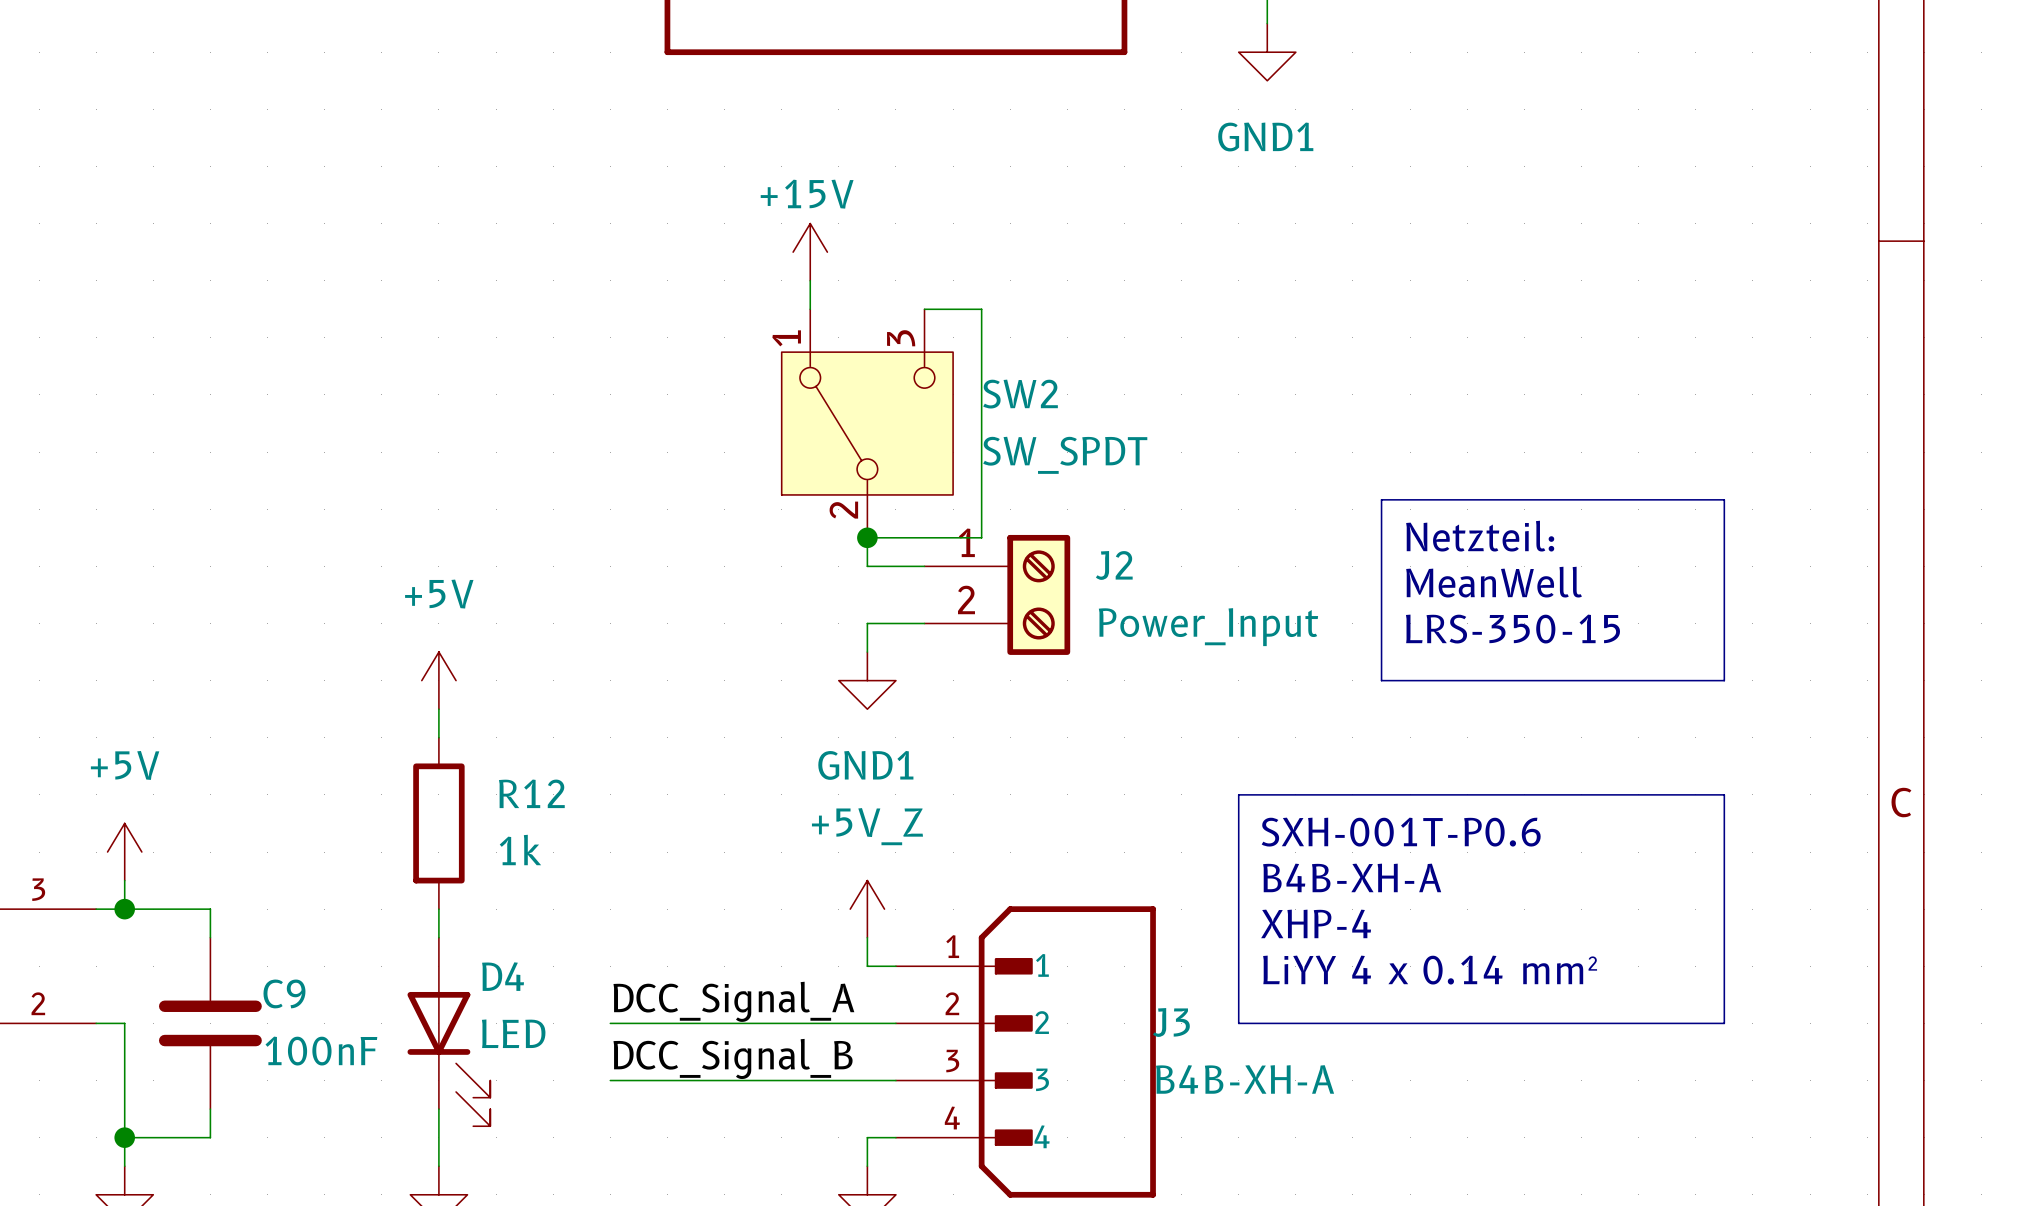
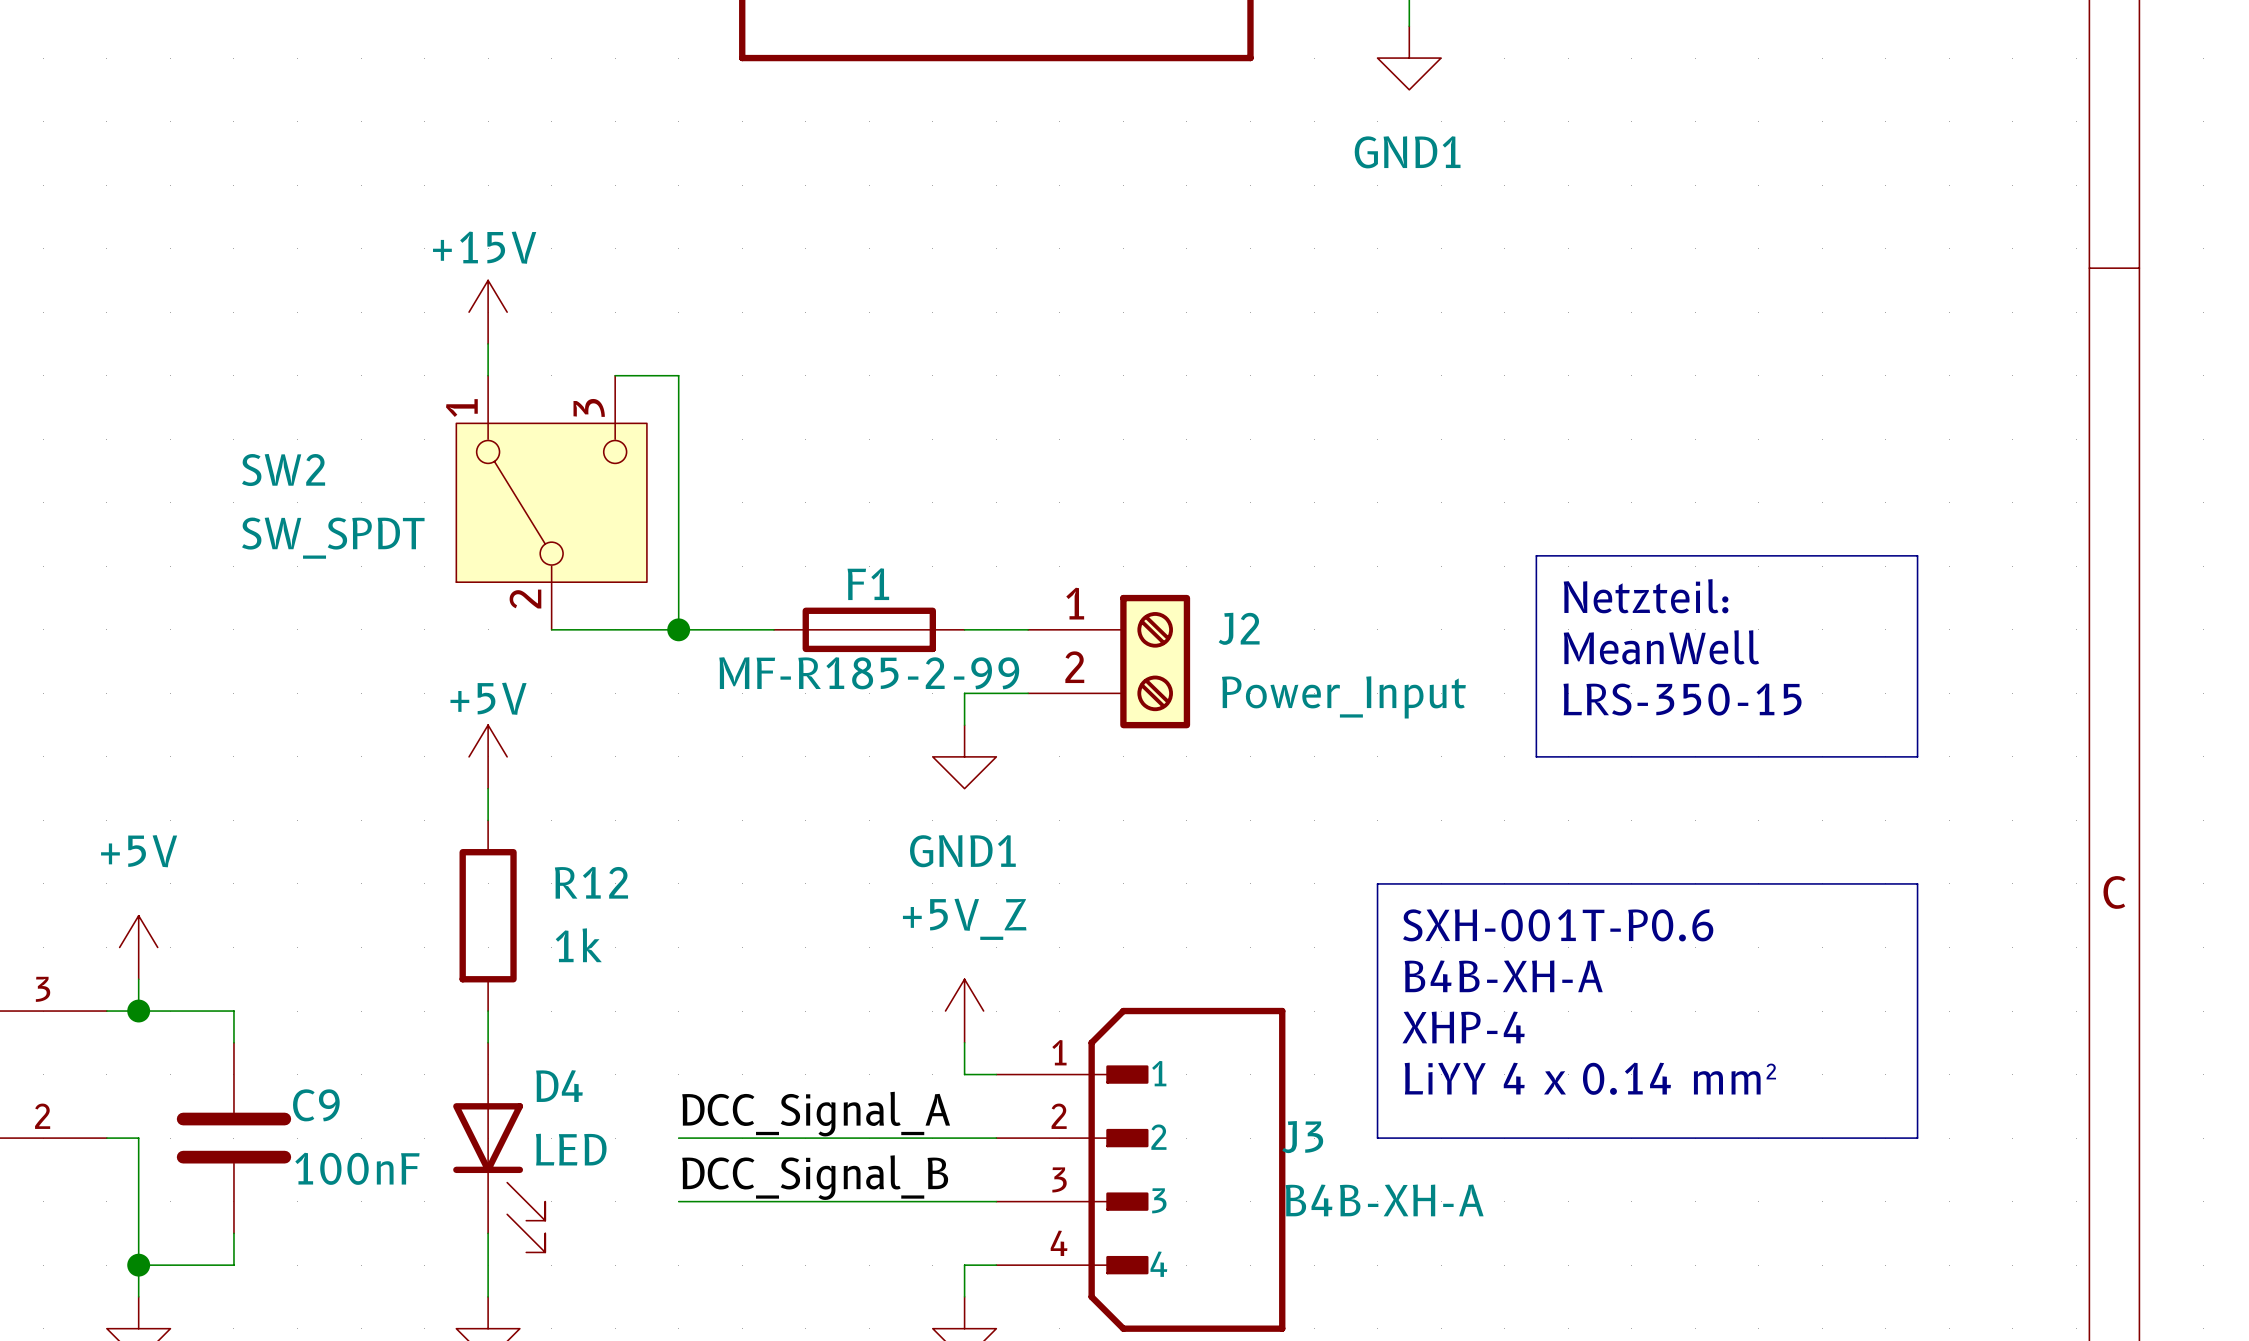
power symbol position: +15V (810, 252) -> +15V (488, 312)
wire: (810, 280) (810, 309) -> (488, 343) (488, 375)
wire: (924, 309) (981, 309) (981, 537) (867, 537) (867, 566) -> none
wire: none -> (615, 375) (678, 375) (678, 629)
SW2 name position: SW2 (1020, 394) -> SW2 (283, 470)
SW2 position: (867, 423) -> (551, 502)
SW2 value position: SW_SPDT (1065, 455) -> SW_SPDT (333, 538)
junction: (867, 537) -> none
wire: none -> (551, 629) (773, 629)
junction: none -> (678, 629)
F1: none -> MF-R185-2-99 (869, 629)
power symbol text position: +5V (439, 594) -> +5V (488, 698)

